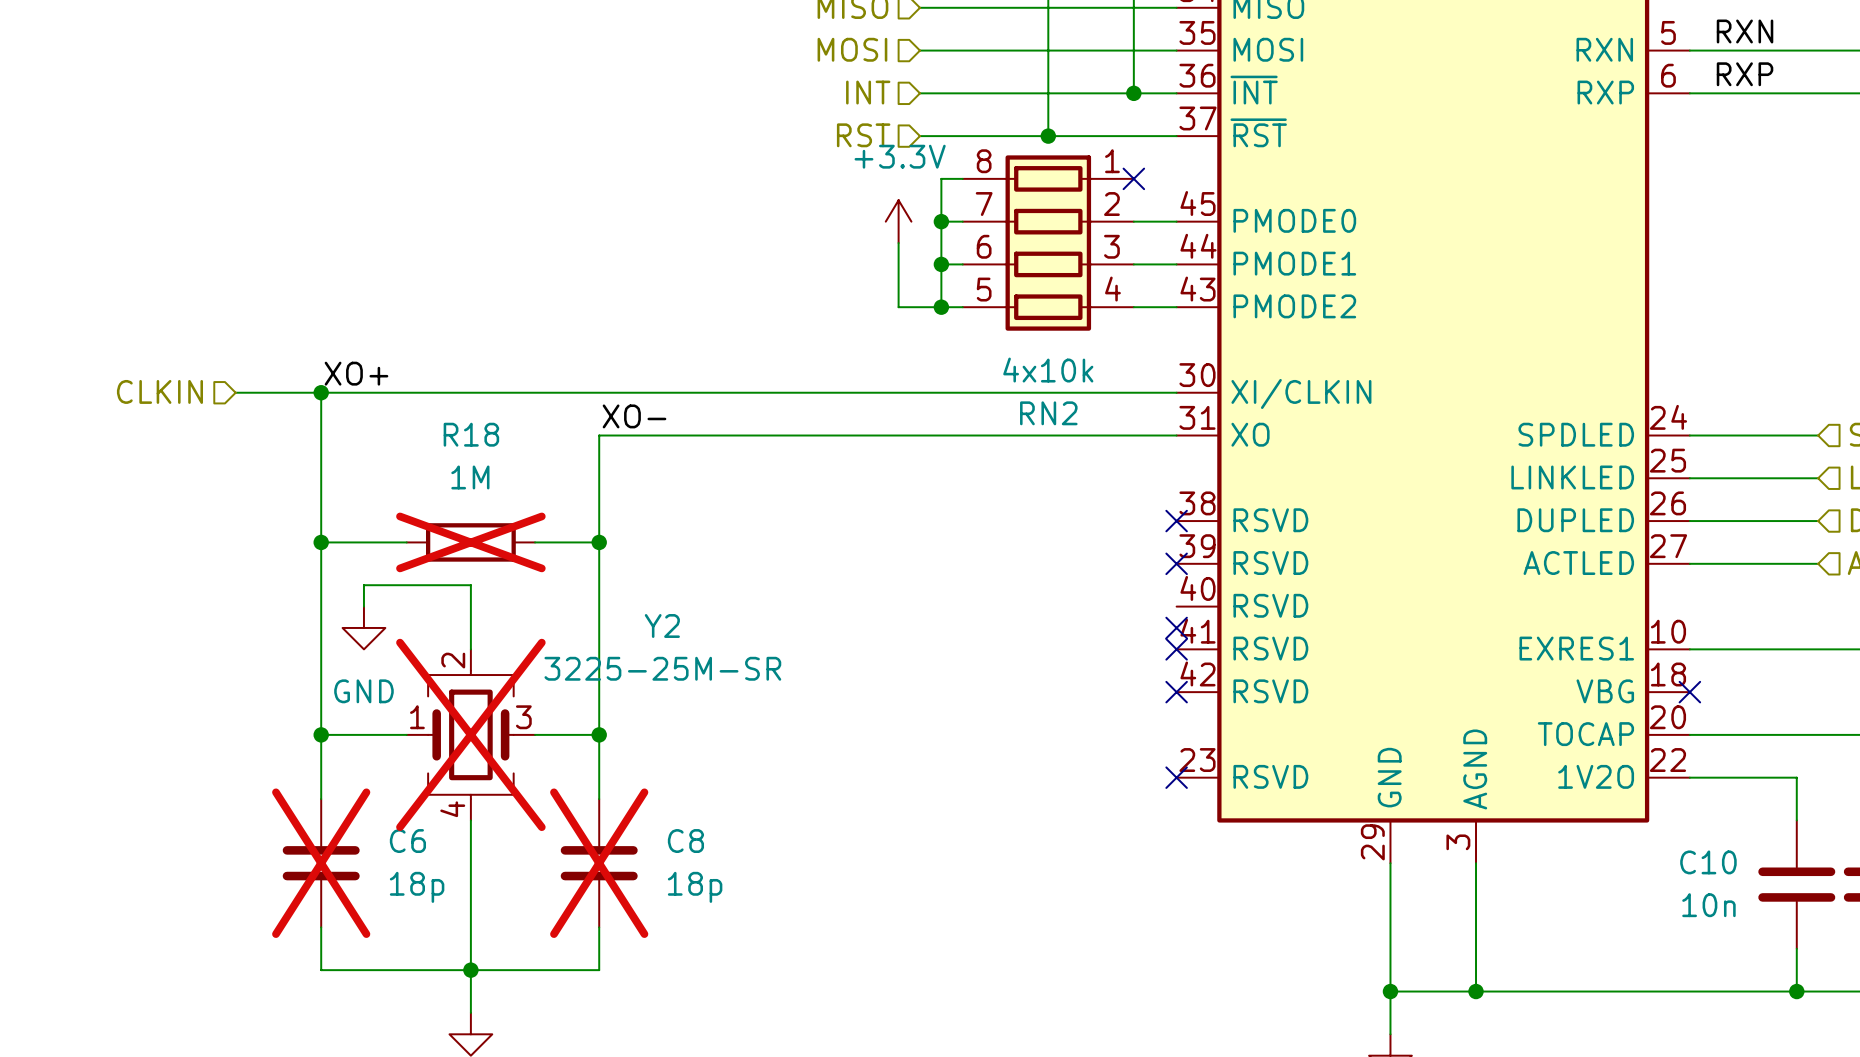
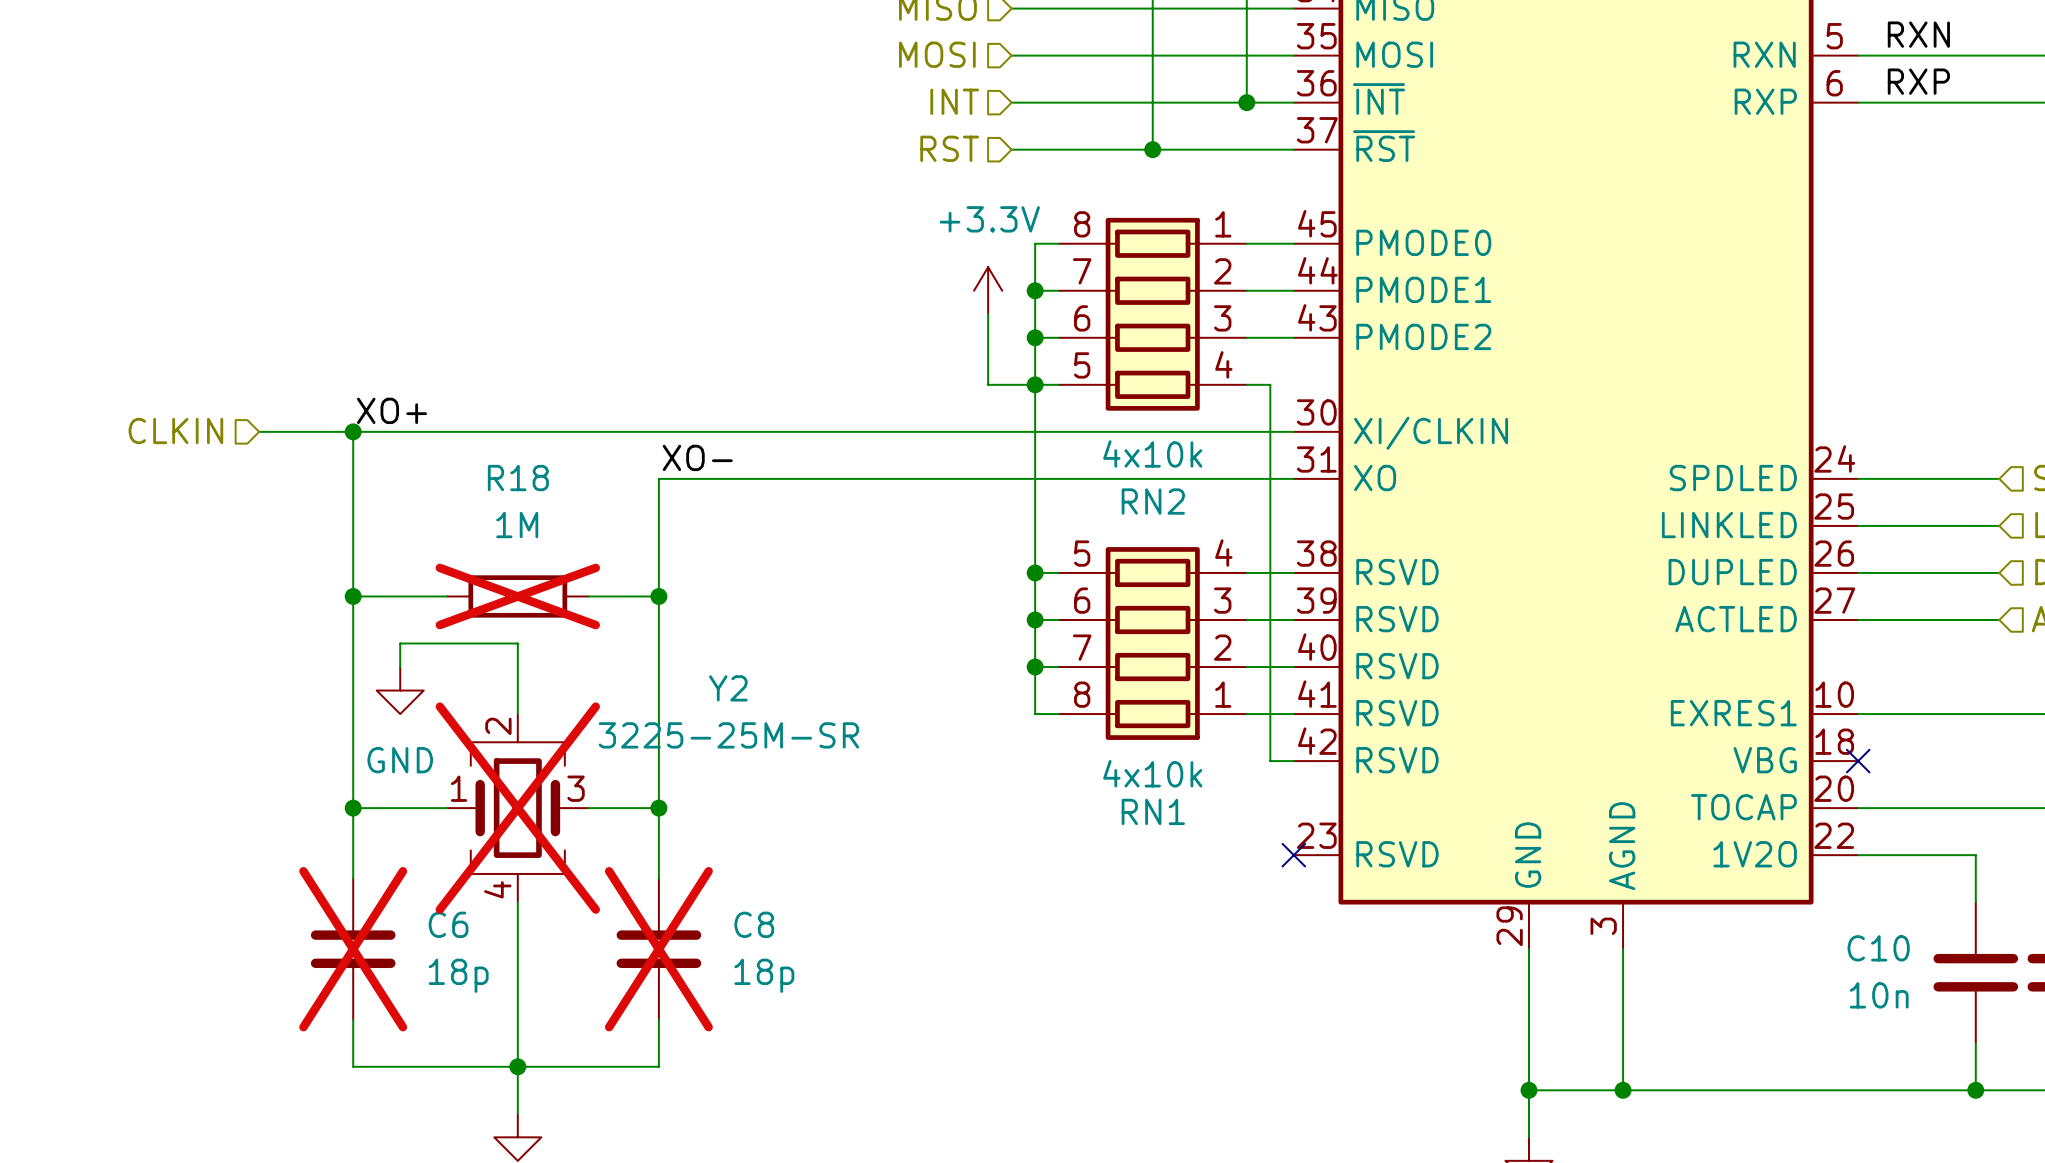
wire: (962, 178) (941, 178) (941, 221) -> none
no-connect mark: (1133, 178) -> none
power symbol position: +3.3V (898, 221) -> +3.3V (988, 290)
junction: (941, 221) -> none
RN2 position: (1048, 243) -> (1152, 314)
wire: (898, 307) (941, 307) -> (988, 337) (988, 384) (1058, 384)
wire: none -> (1035, 337) (1035, 714) (1058, 714)
junction: none -> (1035, 384)
wire: none -> (1246, 384) (1270, 384) (1270, 761) (1293, 761)
wire: none -> (1035, 572) (1058, 572)
junction: none -> (1035, 572)
wire: none -> (1246, 572) (1293, 572)
no-connect mark: (1176, 521) -> none
wire: none -> (1035, 619) (1058, 619)
junction: none -> (1035, 619)
wire: none -> (1246, 619) (1293, 619)
no-connect mark: (1176, 563) -> none
RN1: none -> 4x10k (1152, 643)
wire: none -> (1035, 667) (1058, 667)
junction: none -> (1035, 667)
wire: none -> (1246, 667) (1293, 667)
no-connect mark: (1176, 627) -> none
wire: none -> (1246, 714) (1293, 714)
no-connect mark: (1176, 649) -> none
no-connect mark: (1176, 692) -> none

